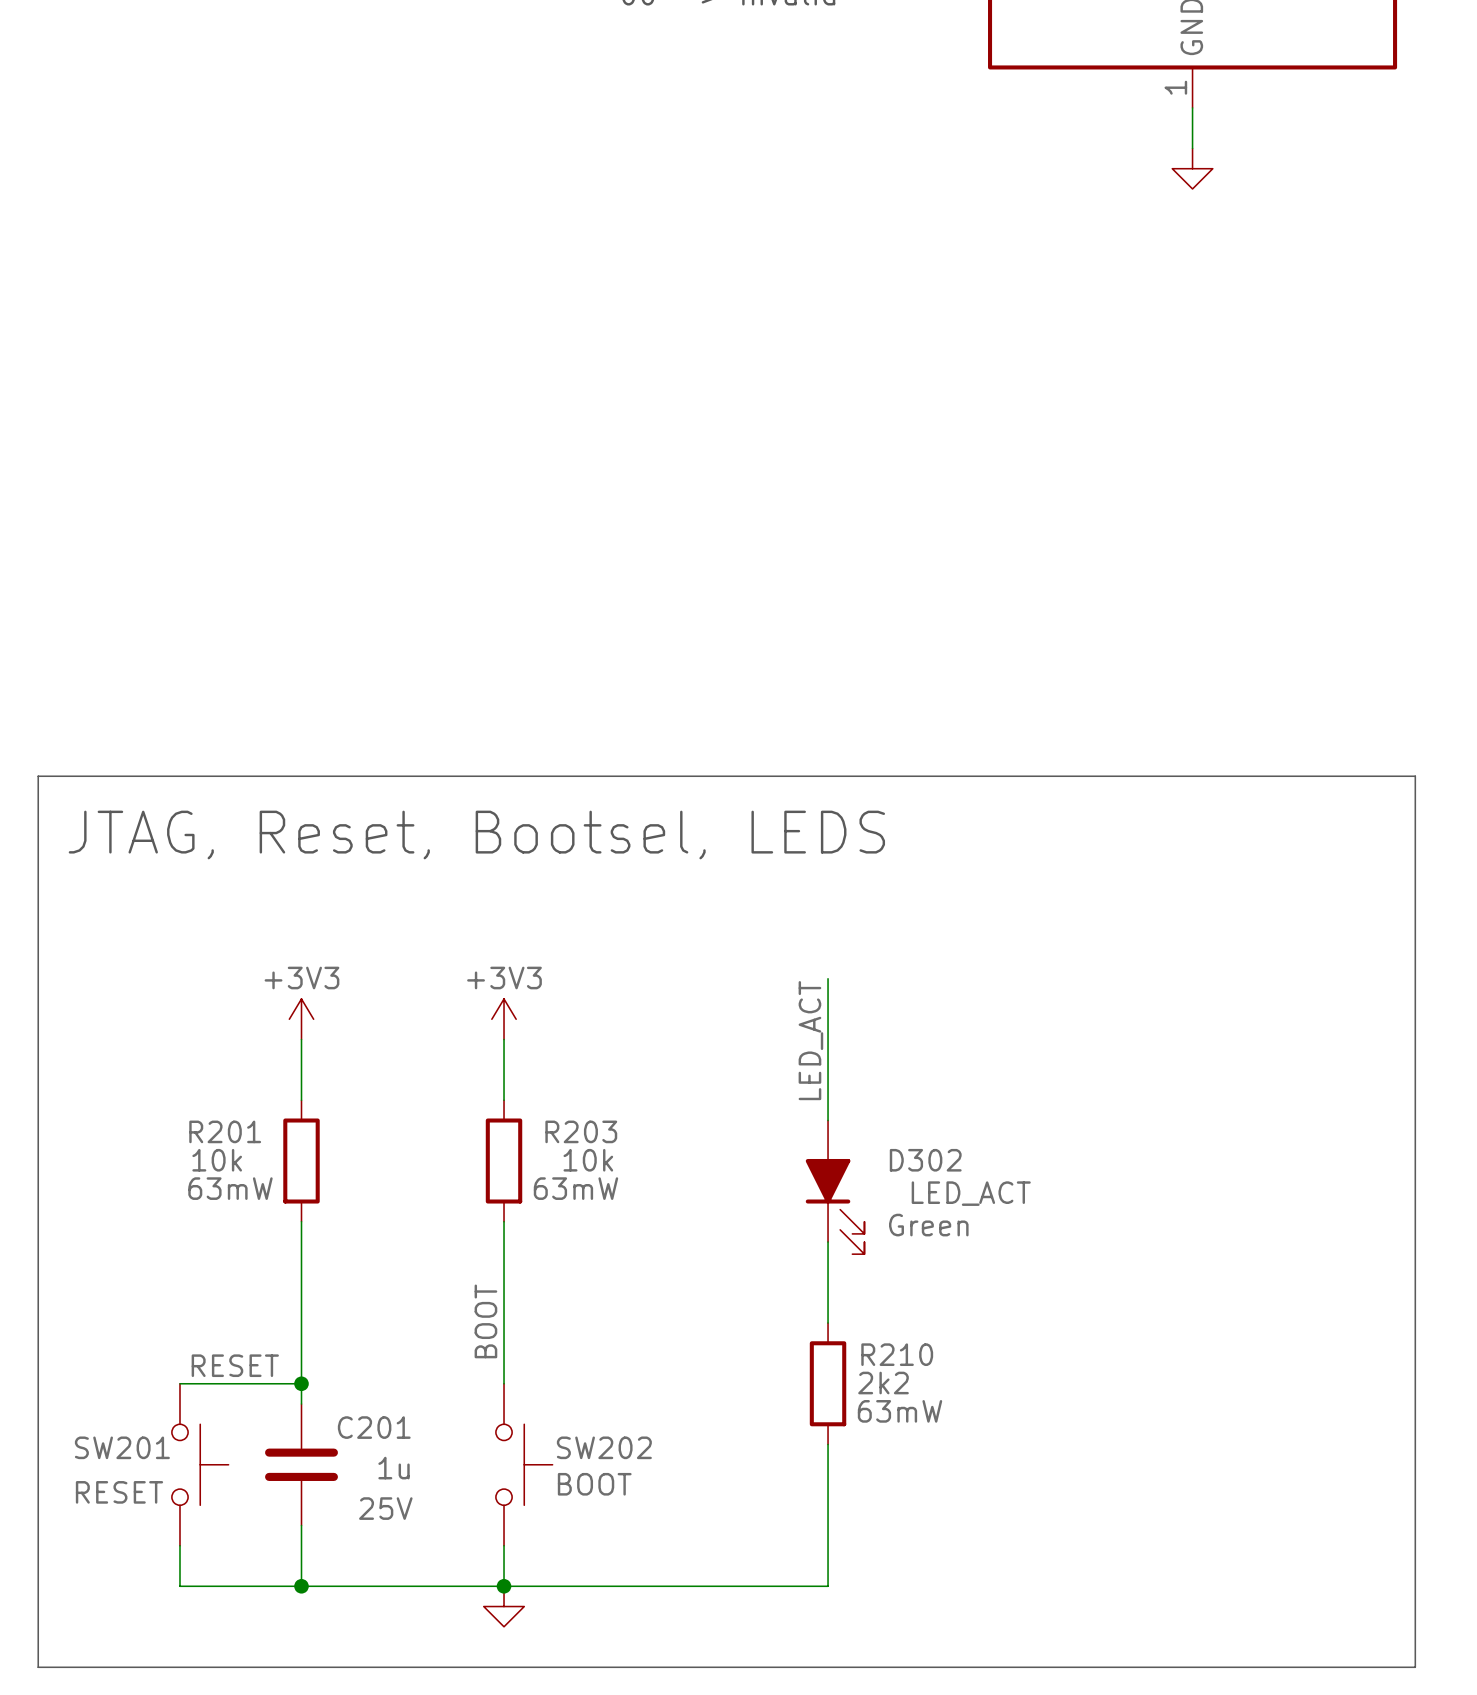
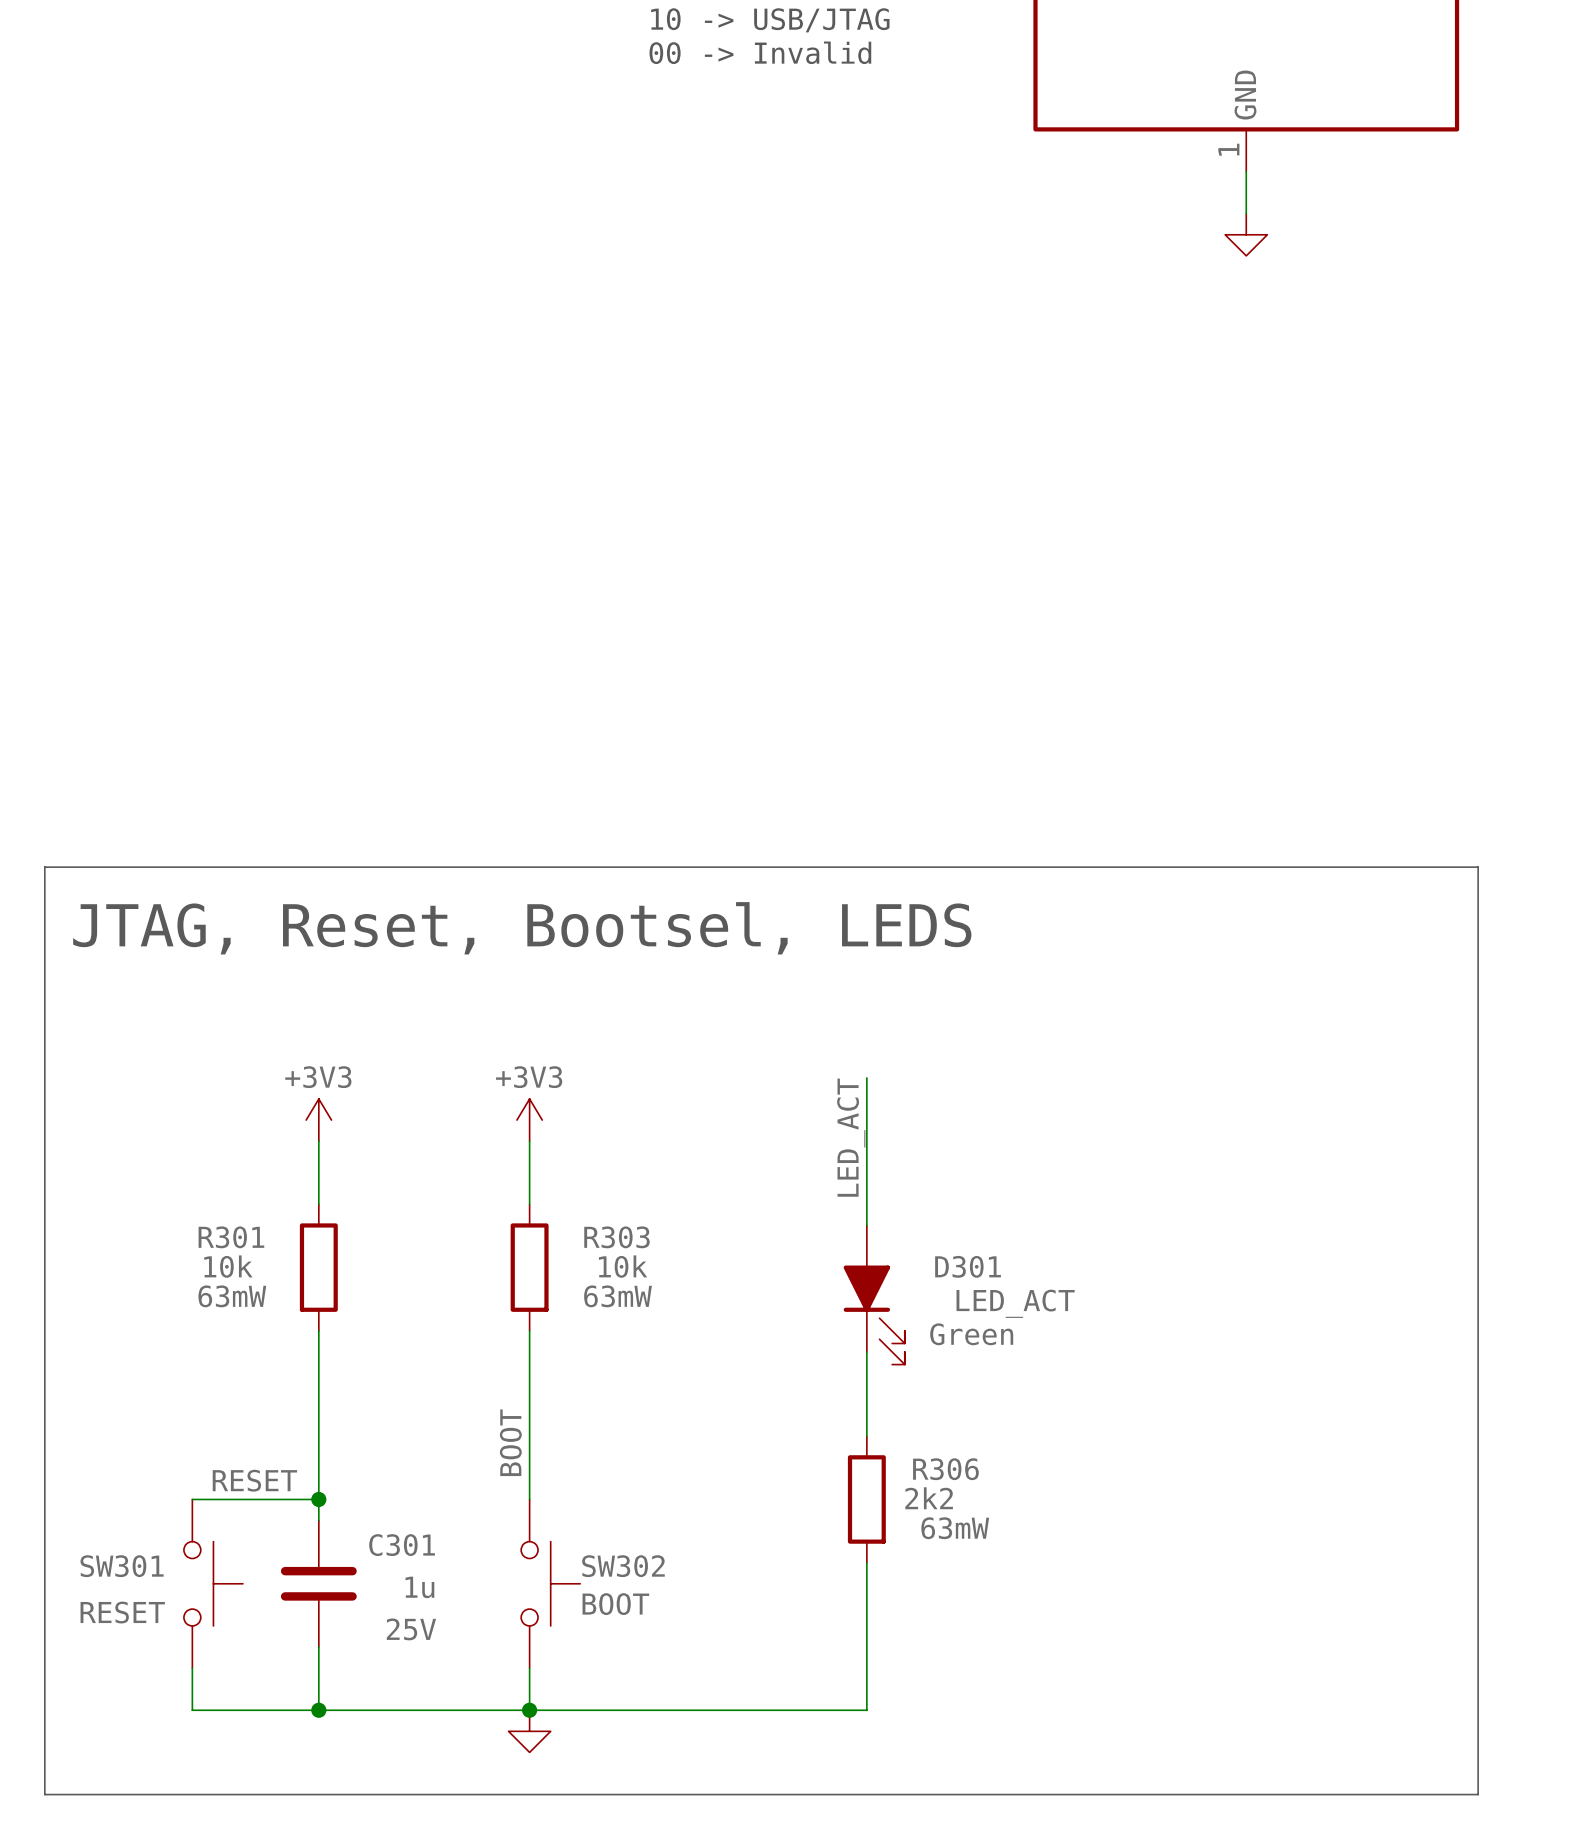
R201 name: R201 (225, 1131) -> R301 (231, 1237)
R203 name: R203 (581, 1131) -> R303 (616, 1237)
D302 name: D302 (925, 1160) -> D301 (968, 1266)
R210 name: R210 (897, 1354) -> R306 (945, 1469)
C201 name: C201 (374, 1427) -> C301 (402, 1545)
SW201 name: SW201 (122, 1447) -> SW301 (122, 1566)
SW202 name: SW202 (604, 1447) -> SW302 (623, 1566)

